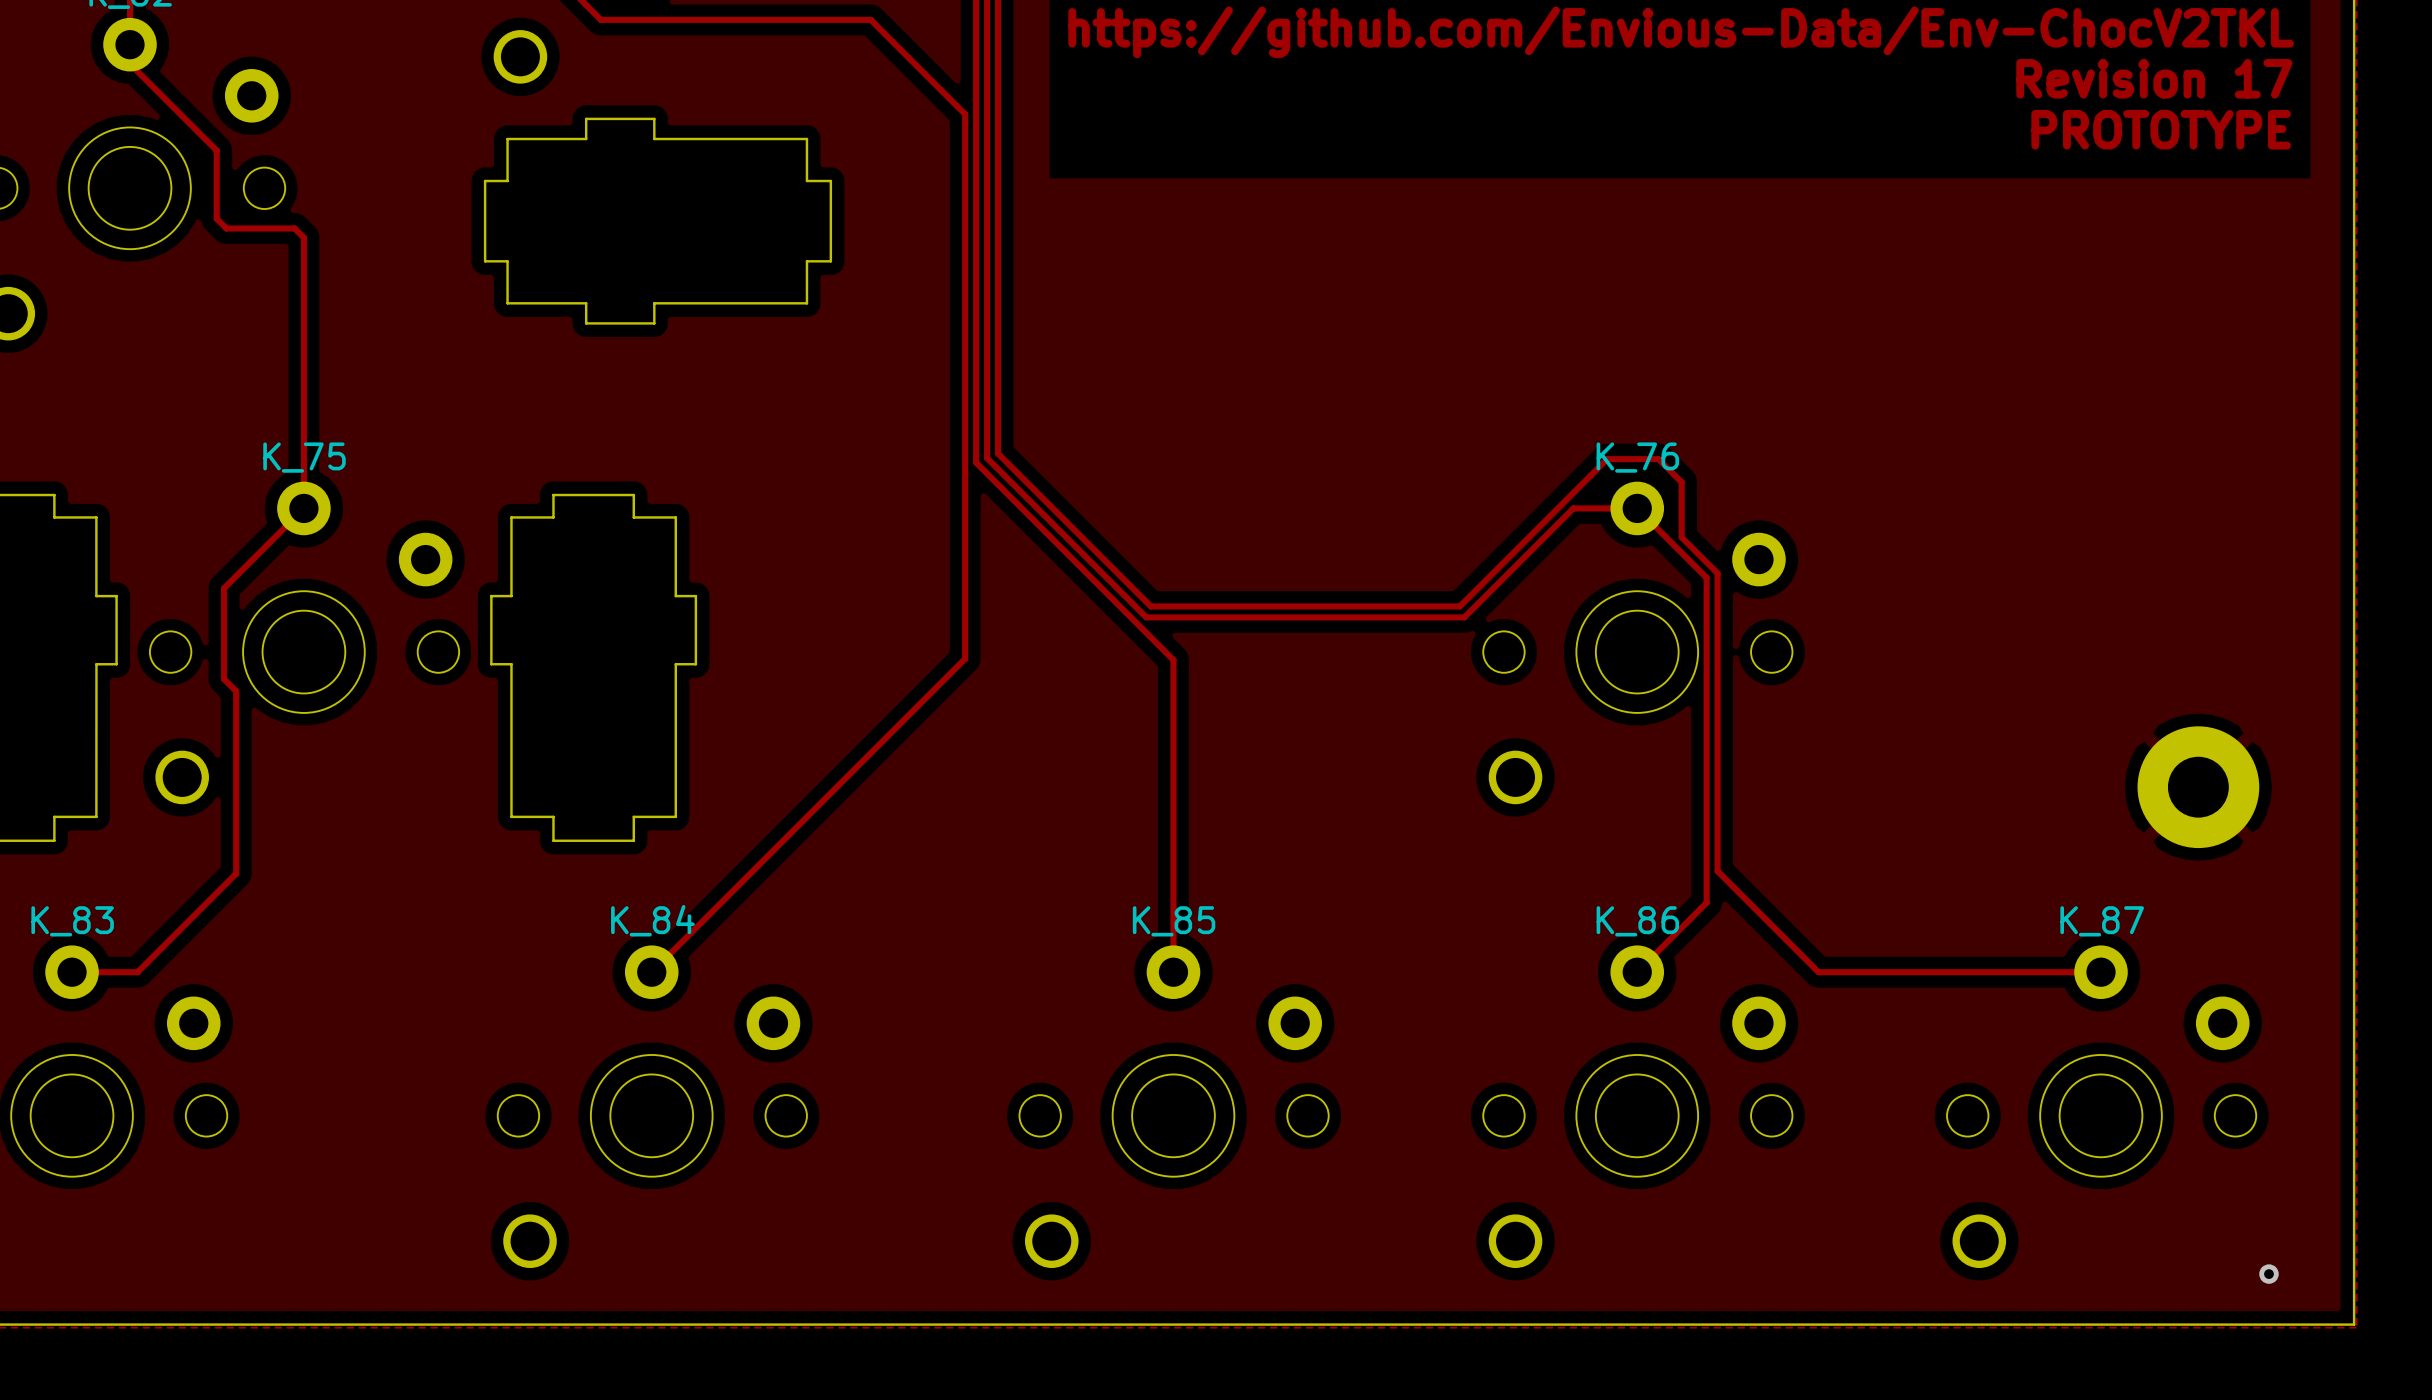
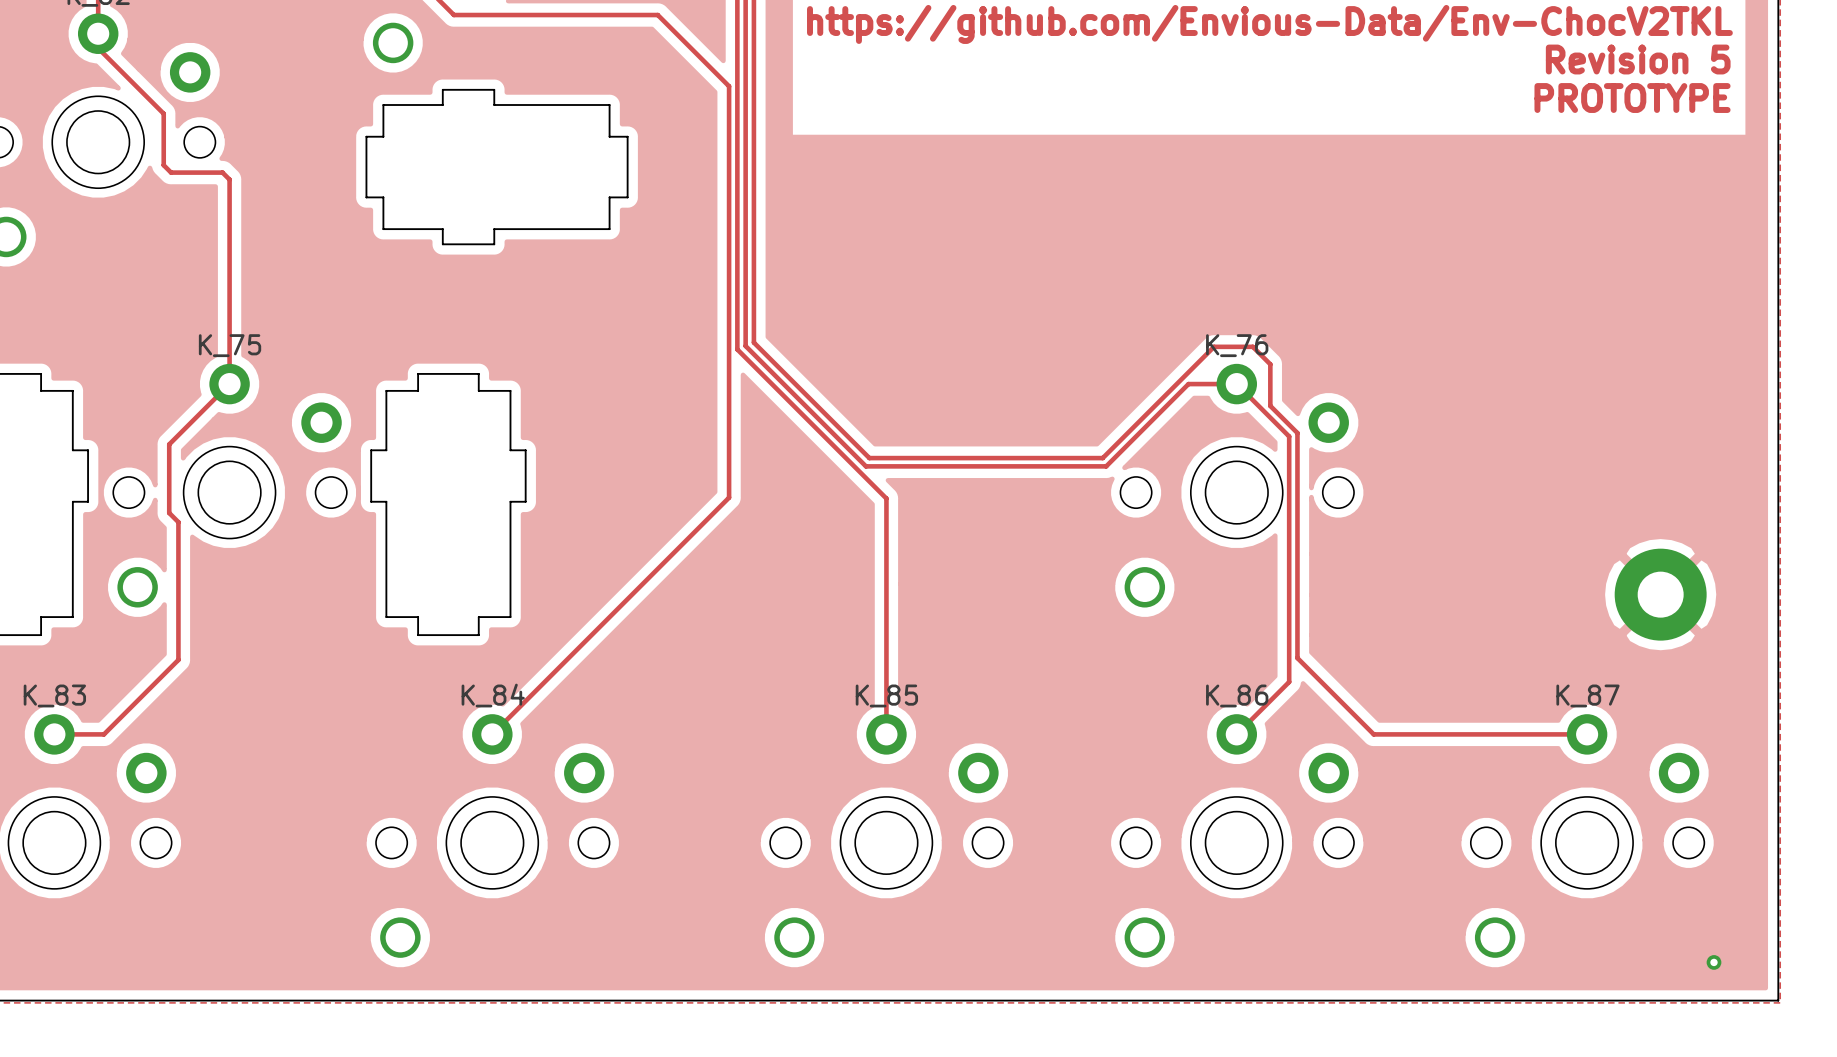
text: Revision 17 (2154, 78) -> Revision 5 (1638, 59)

